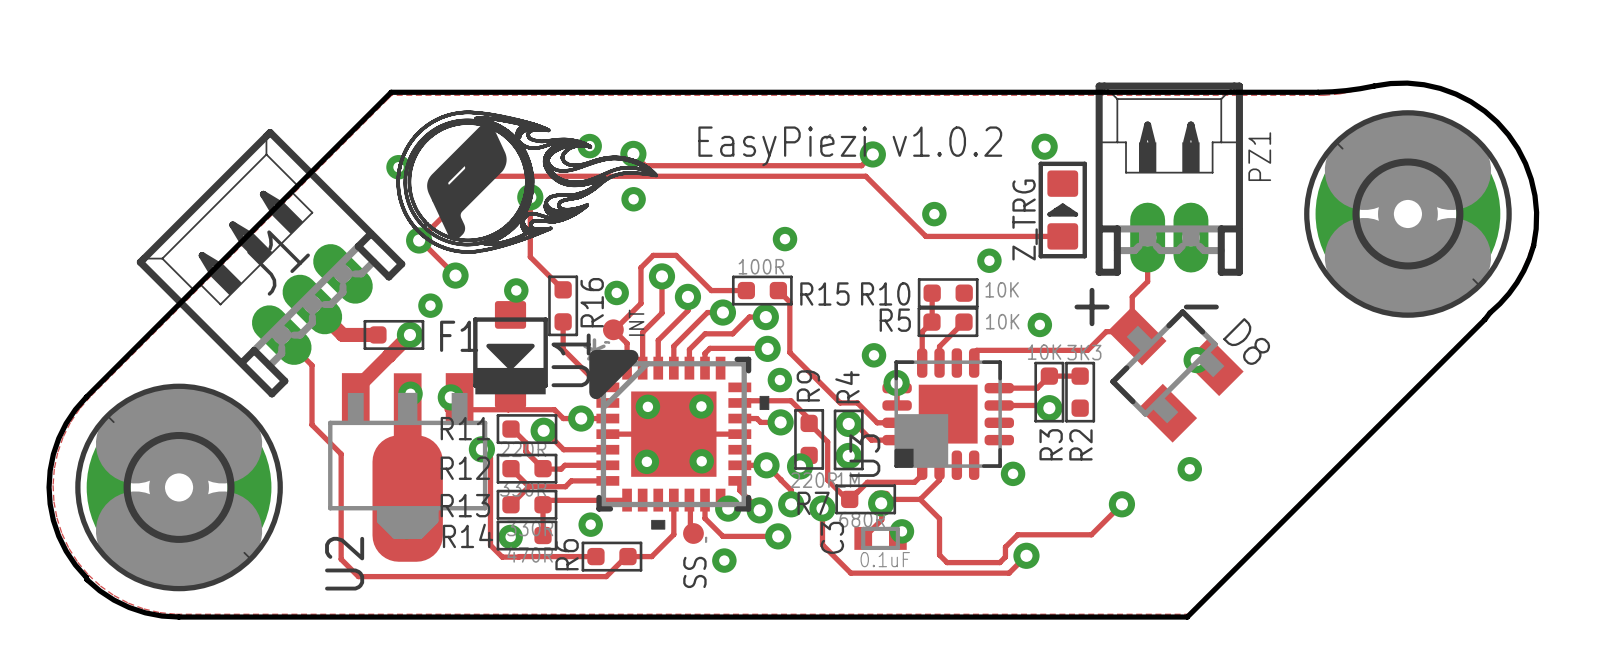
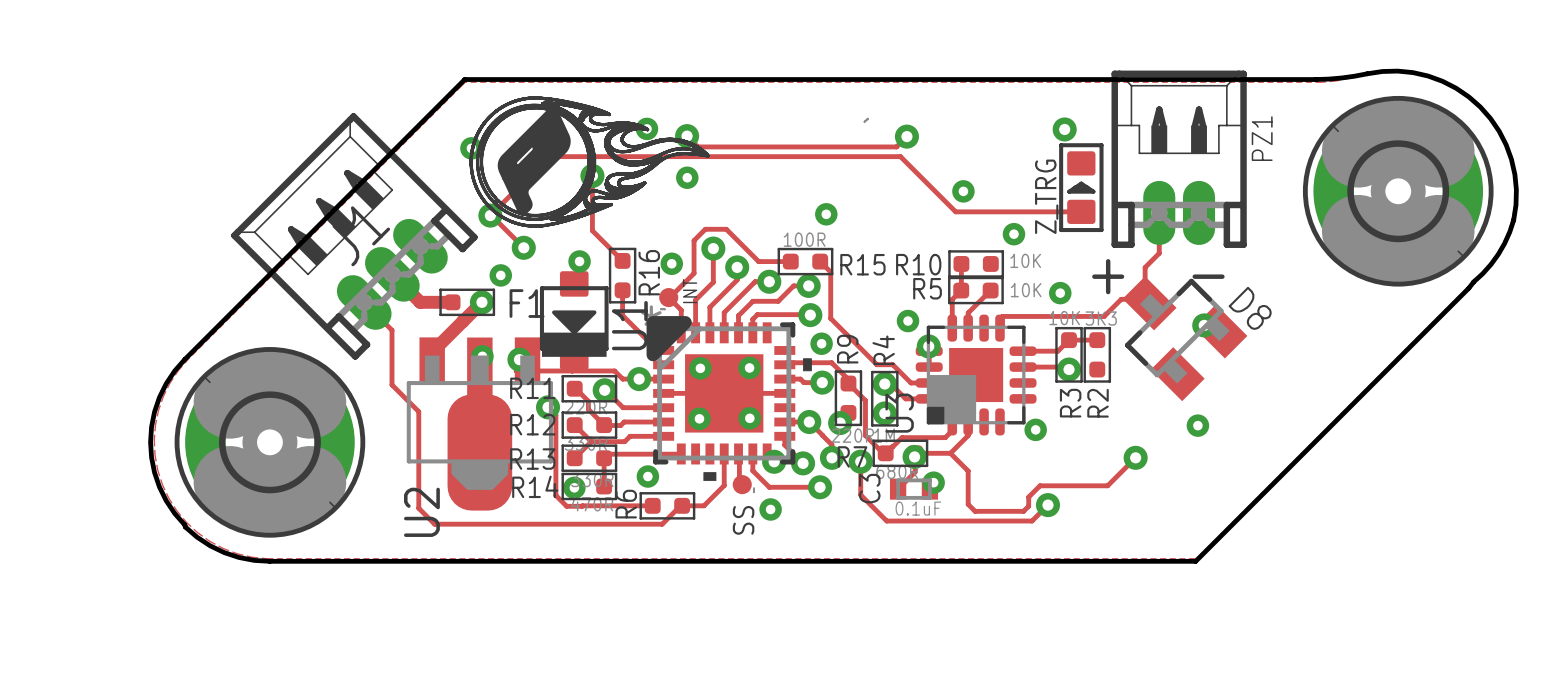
text: EasyPiezi v1.0.2 (850, 146) -> none

